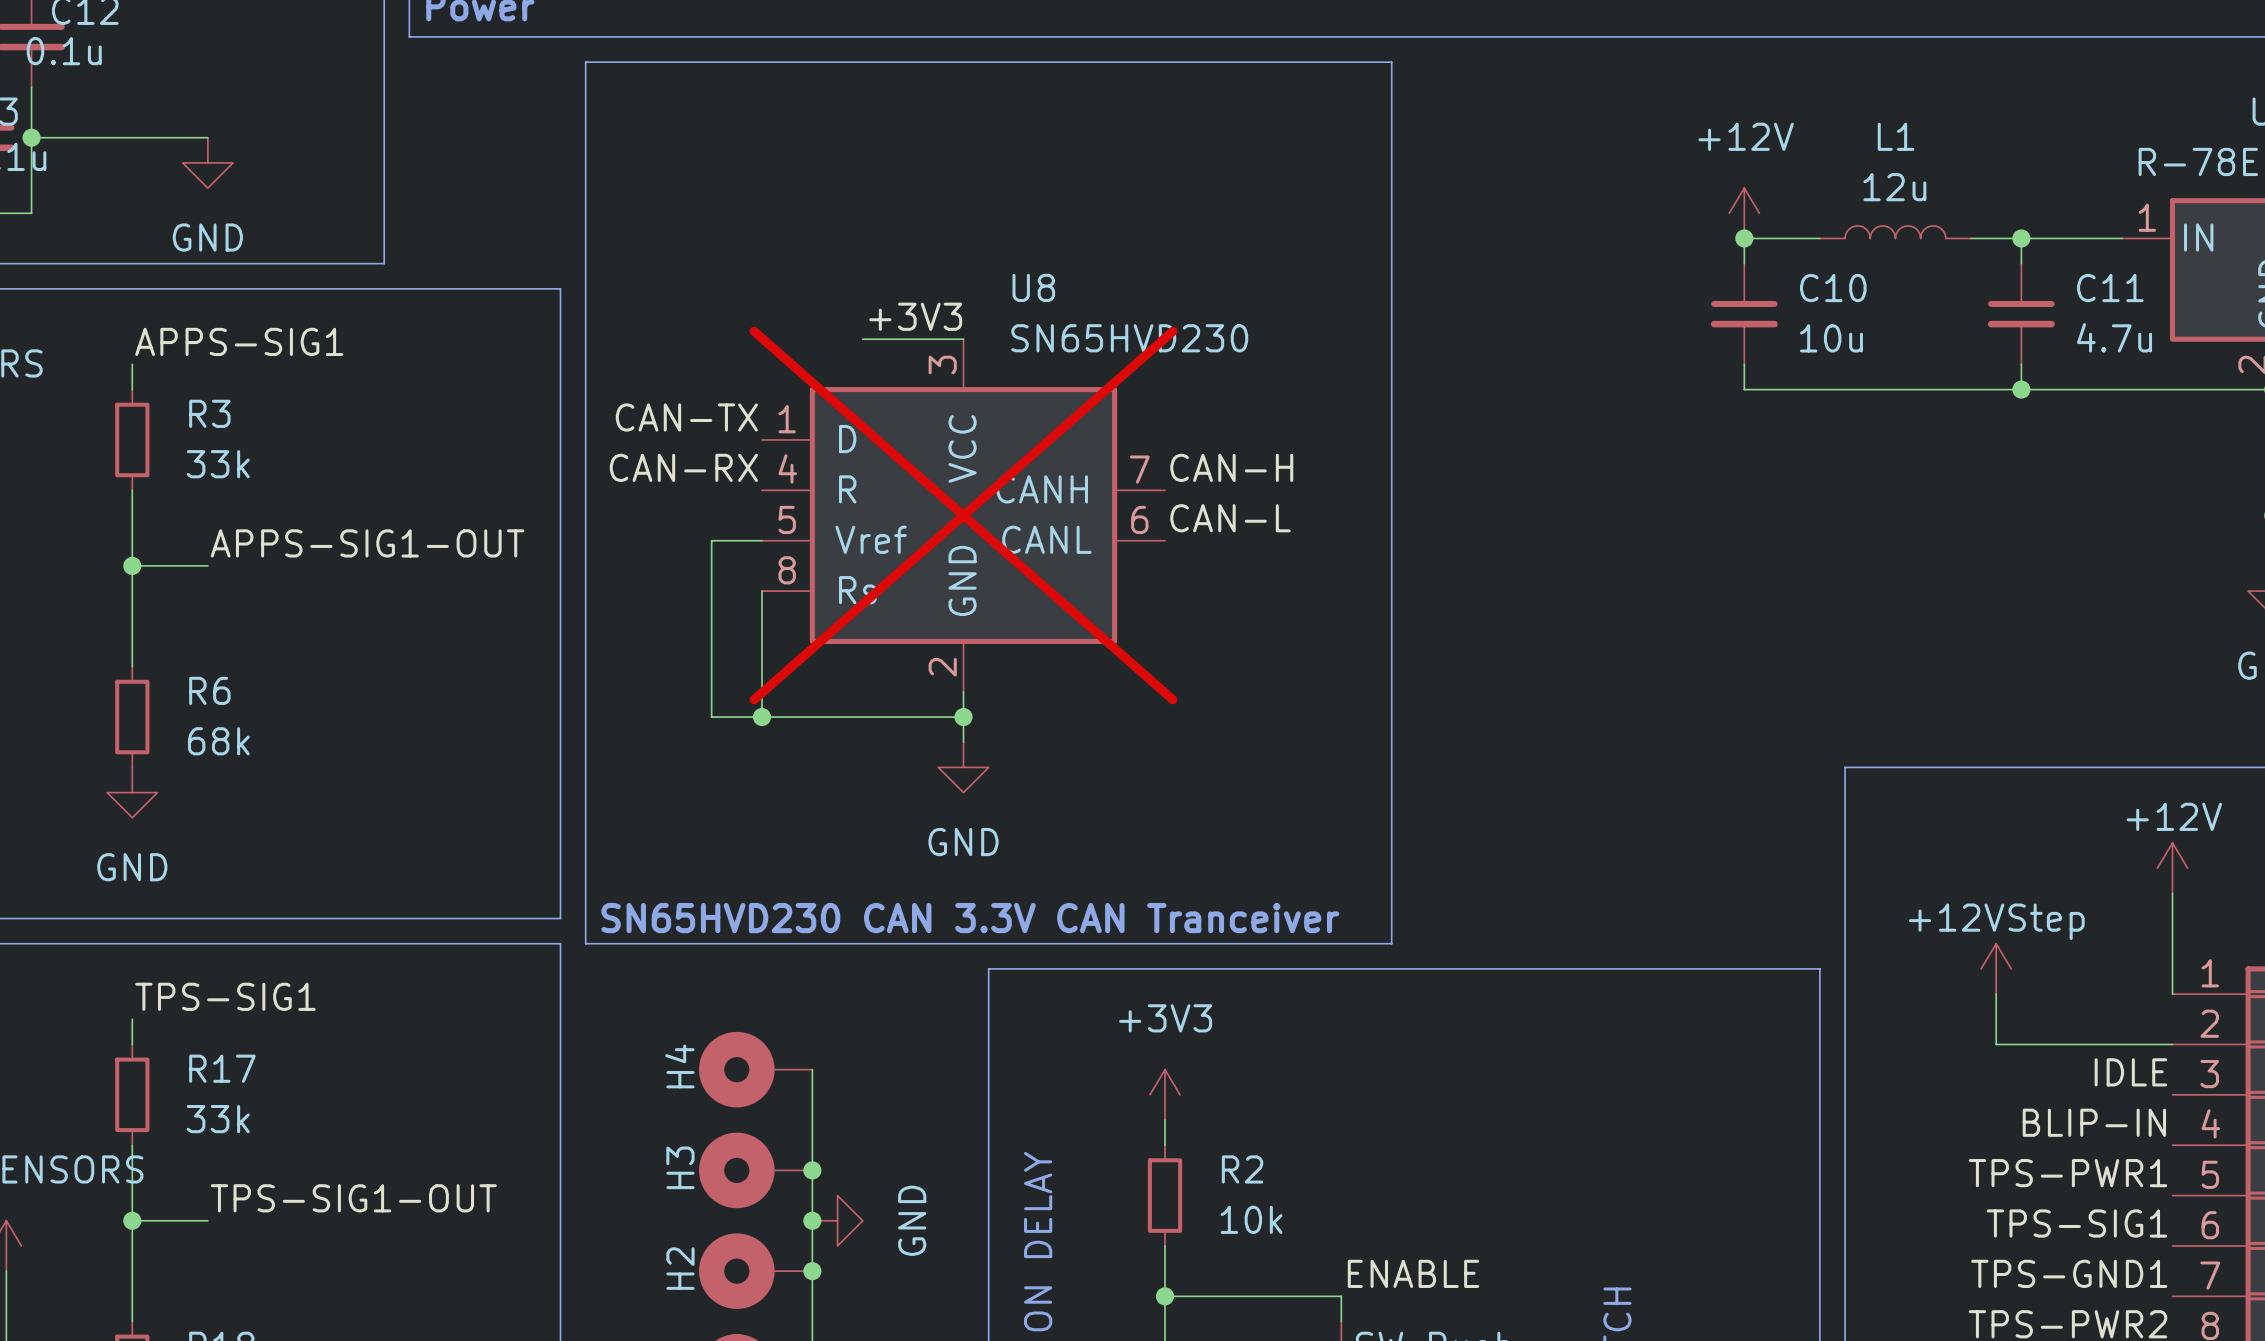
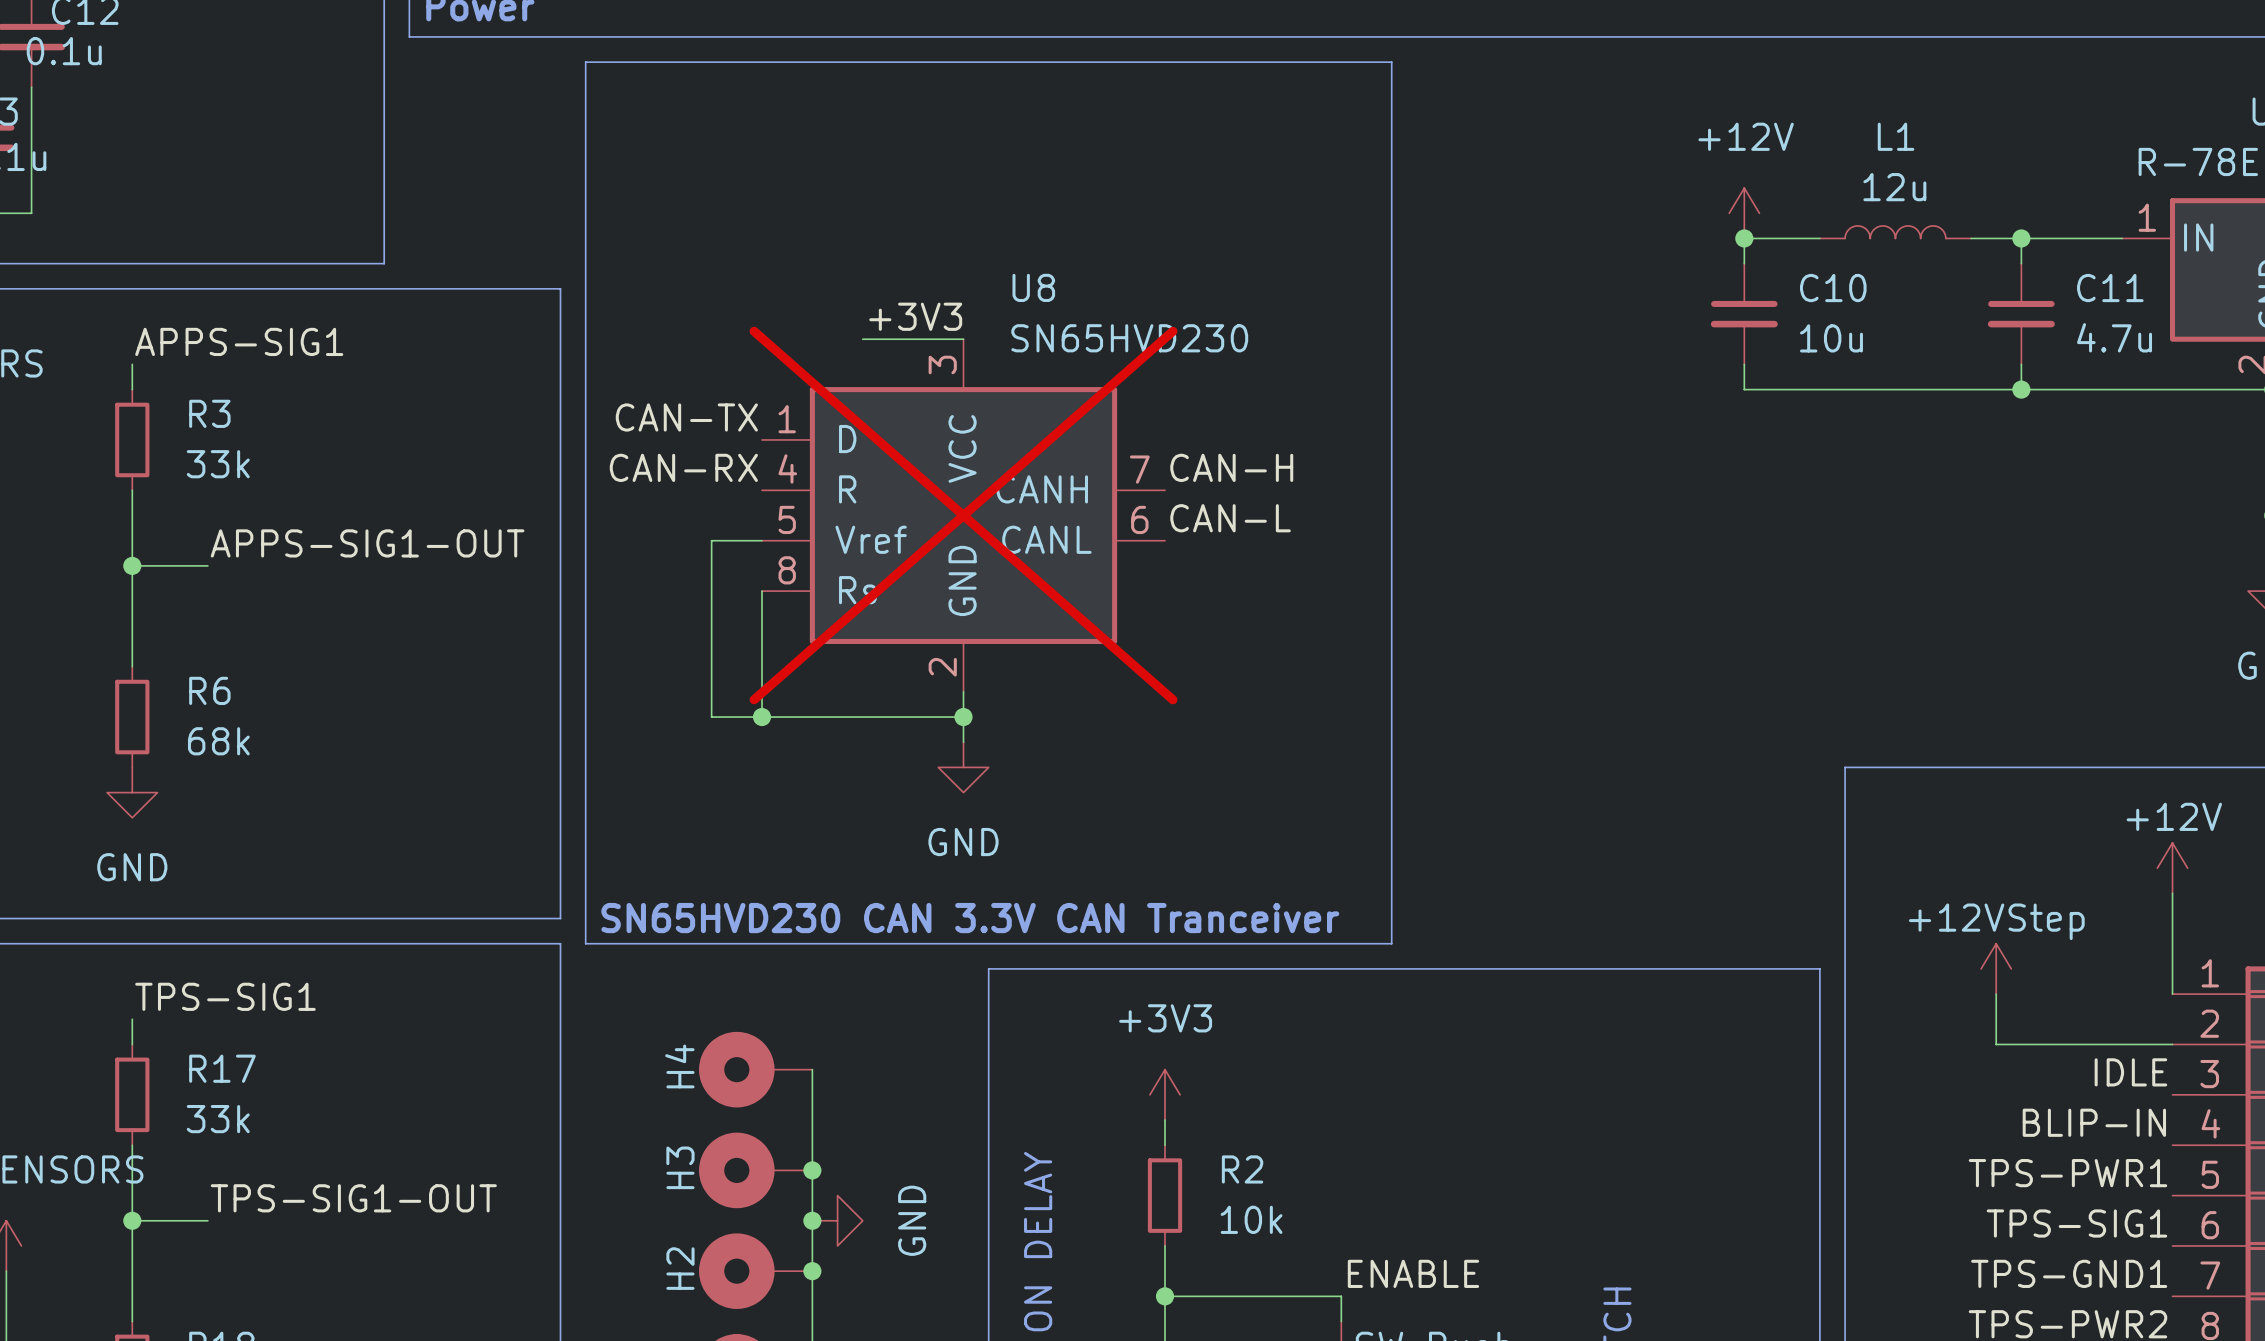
wire: (31, 137) (207, 137) -> none
junction: (31, 137) -> none
power symbol: GND (207, 162) -> none

